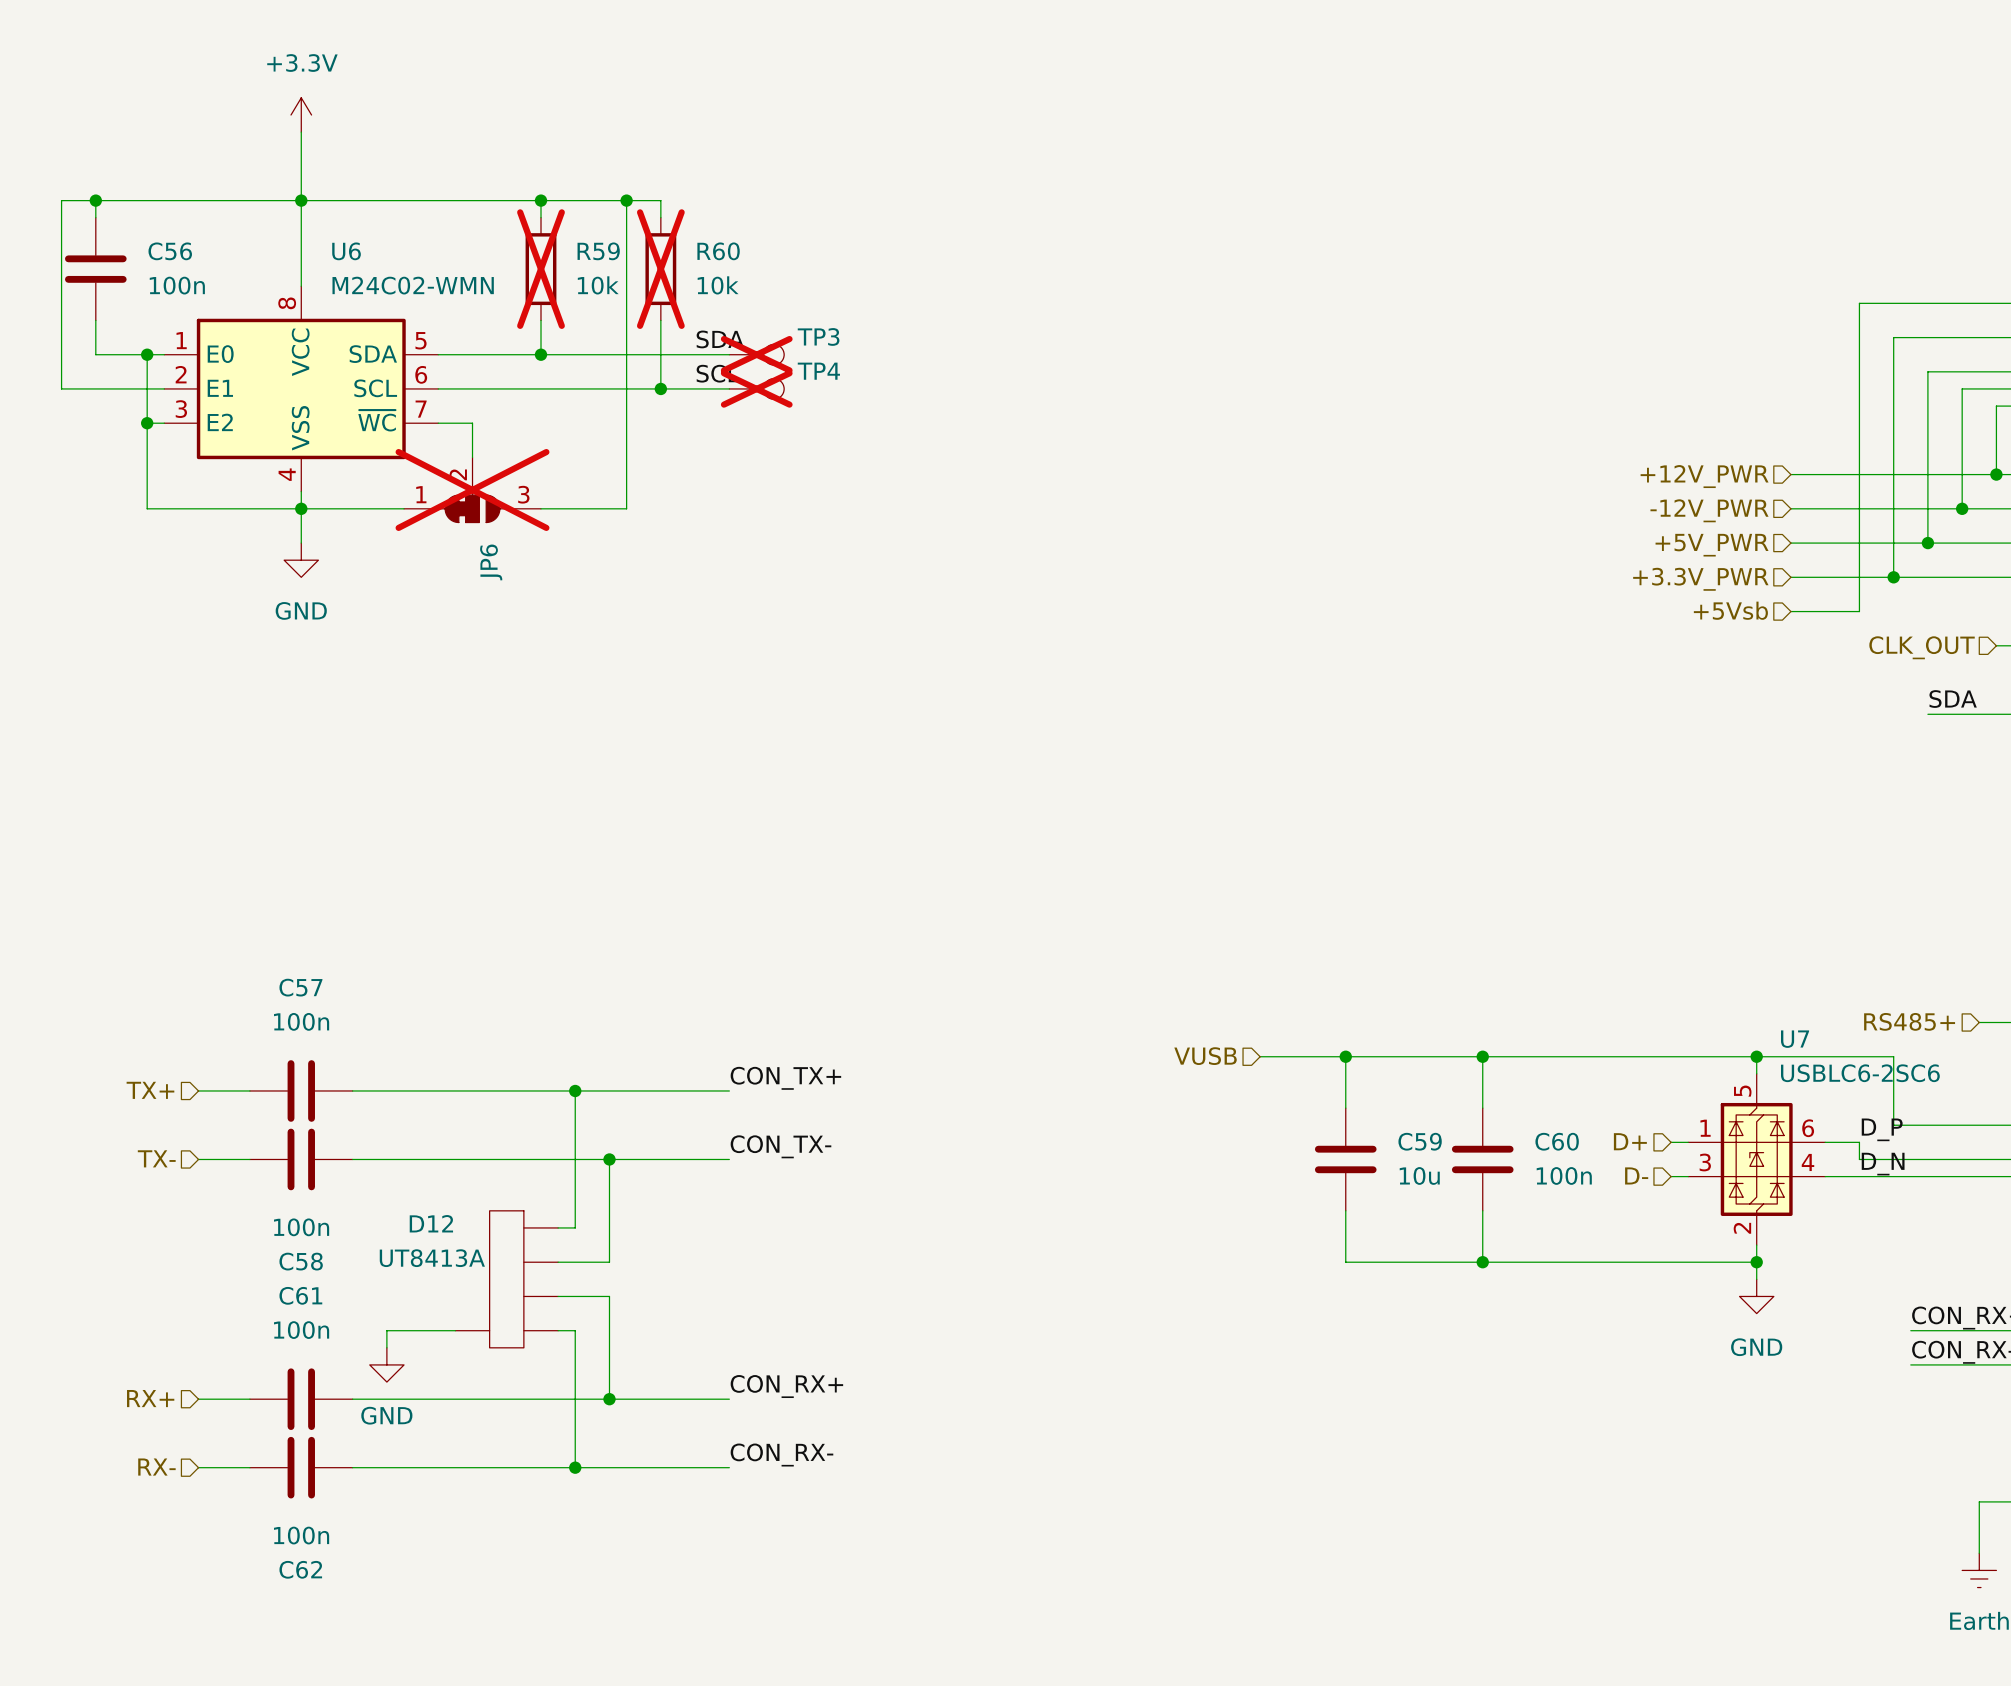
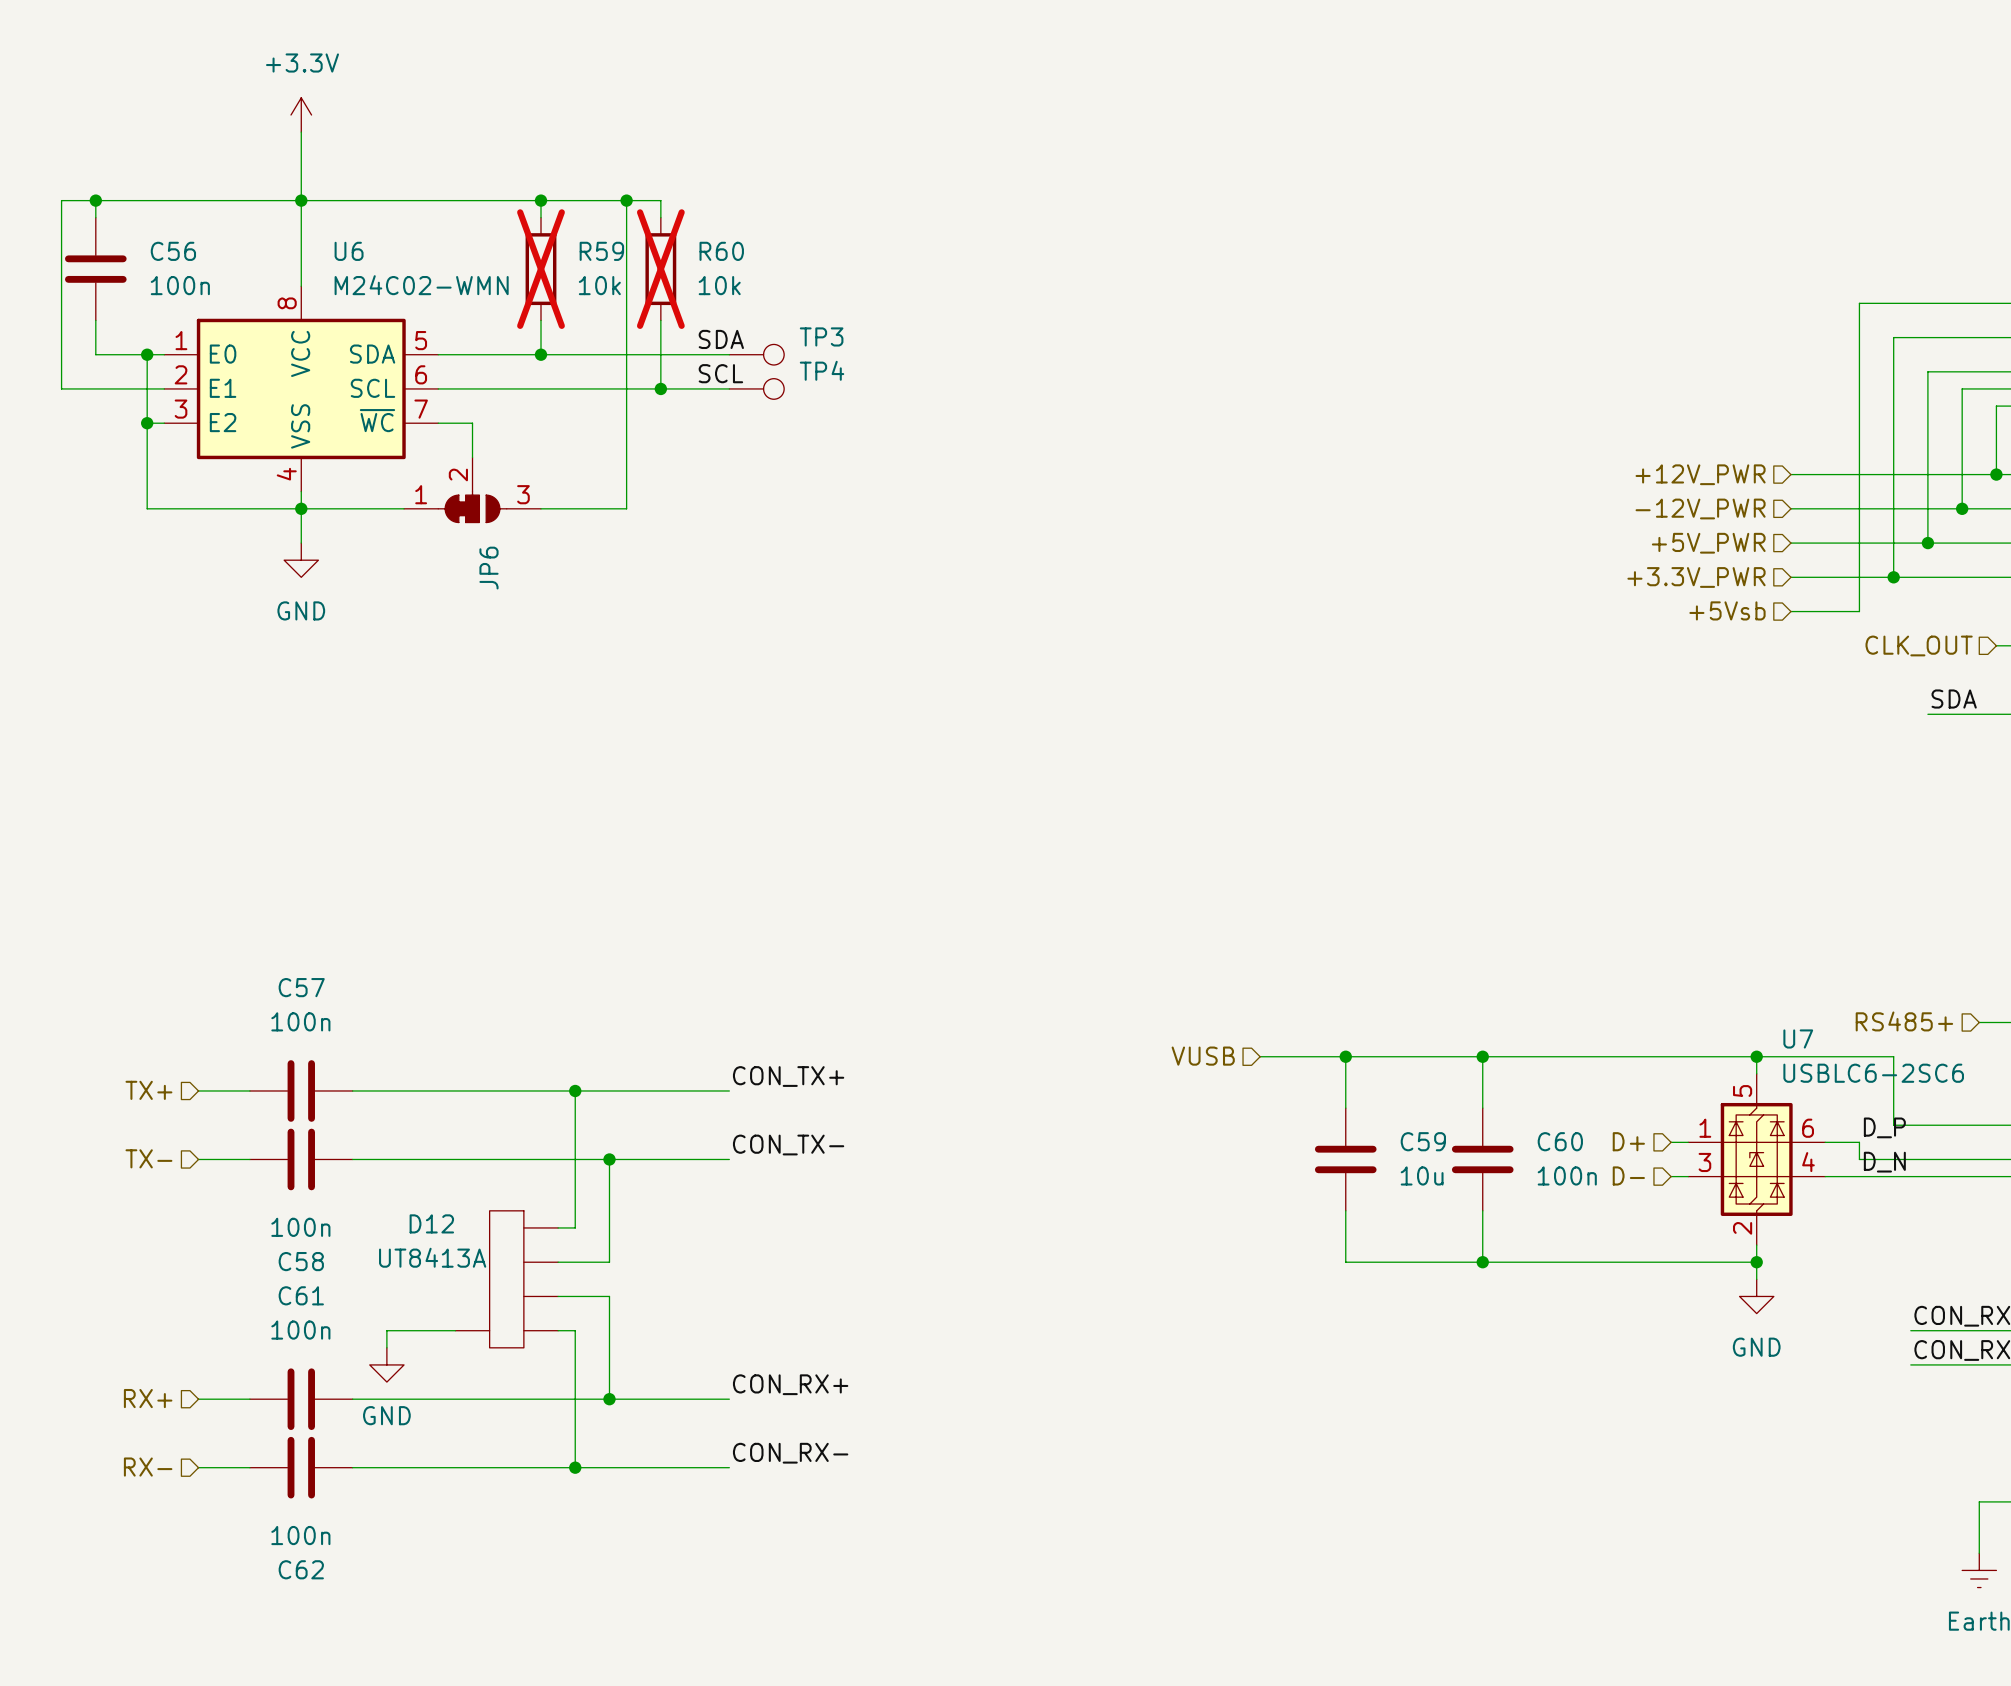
TP3 do-not-place cross: (756, 354) -> none
TP4 do-not-place cross: (756, 388) -> none
JP6 do-not-place cross: (472, 489) -> none

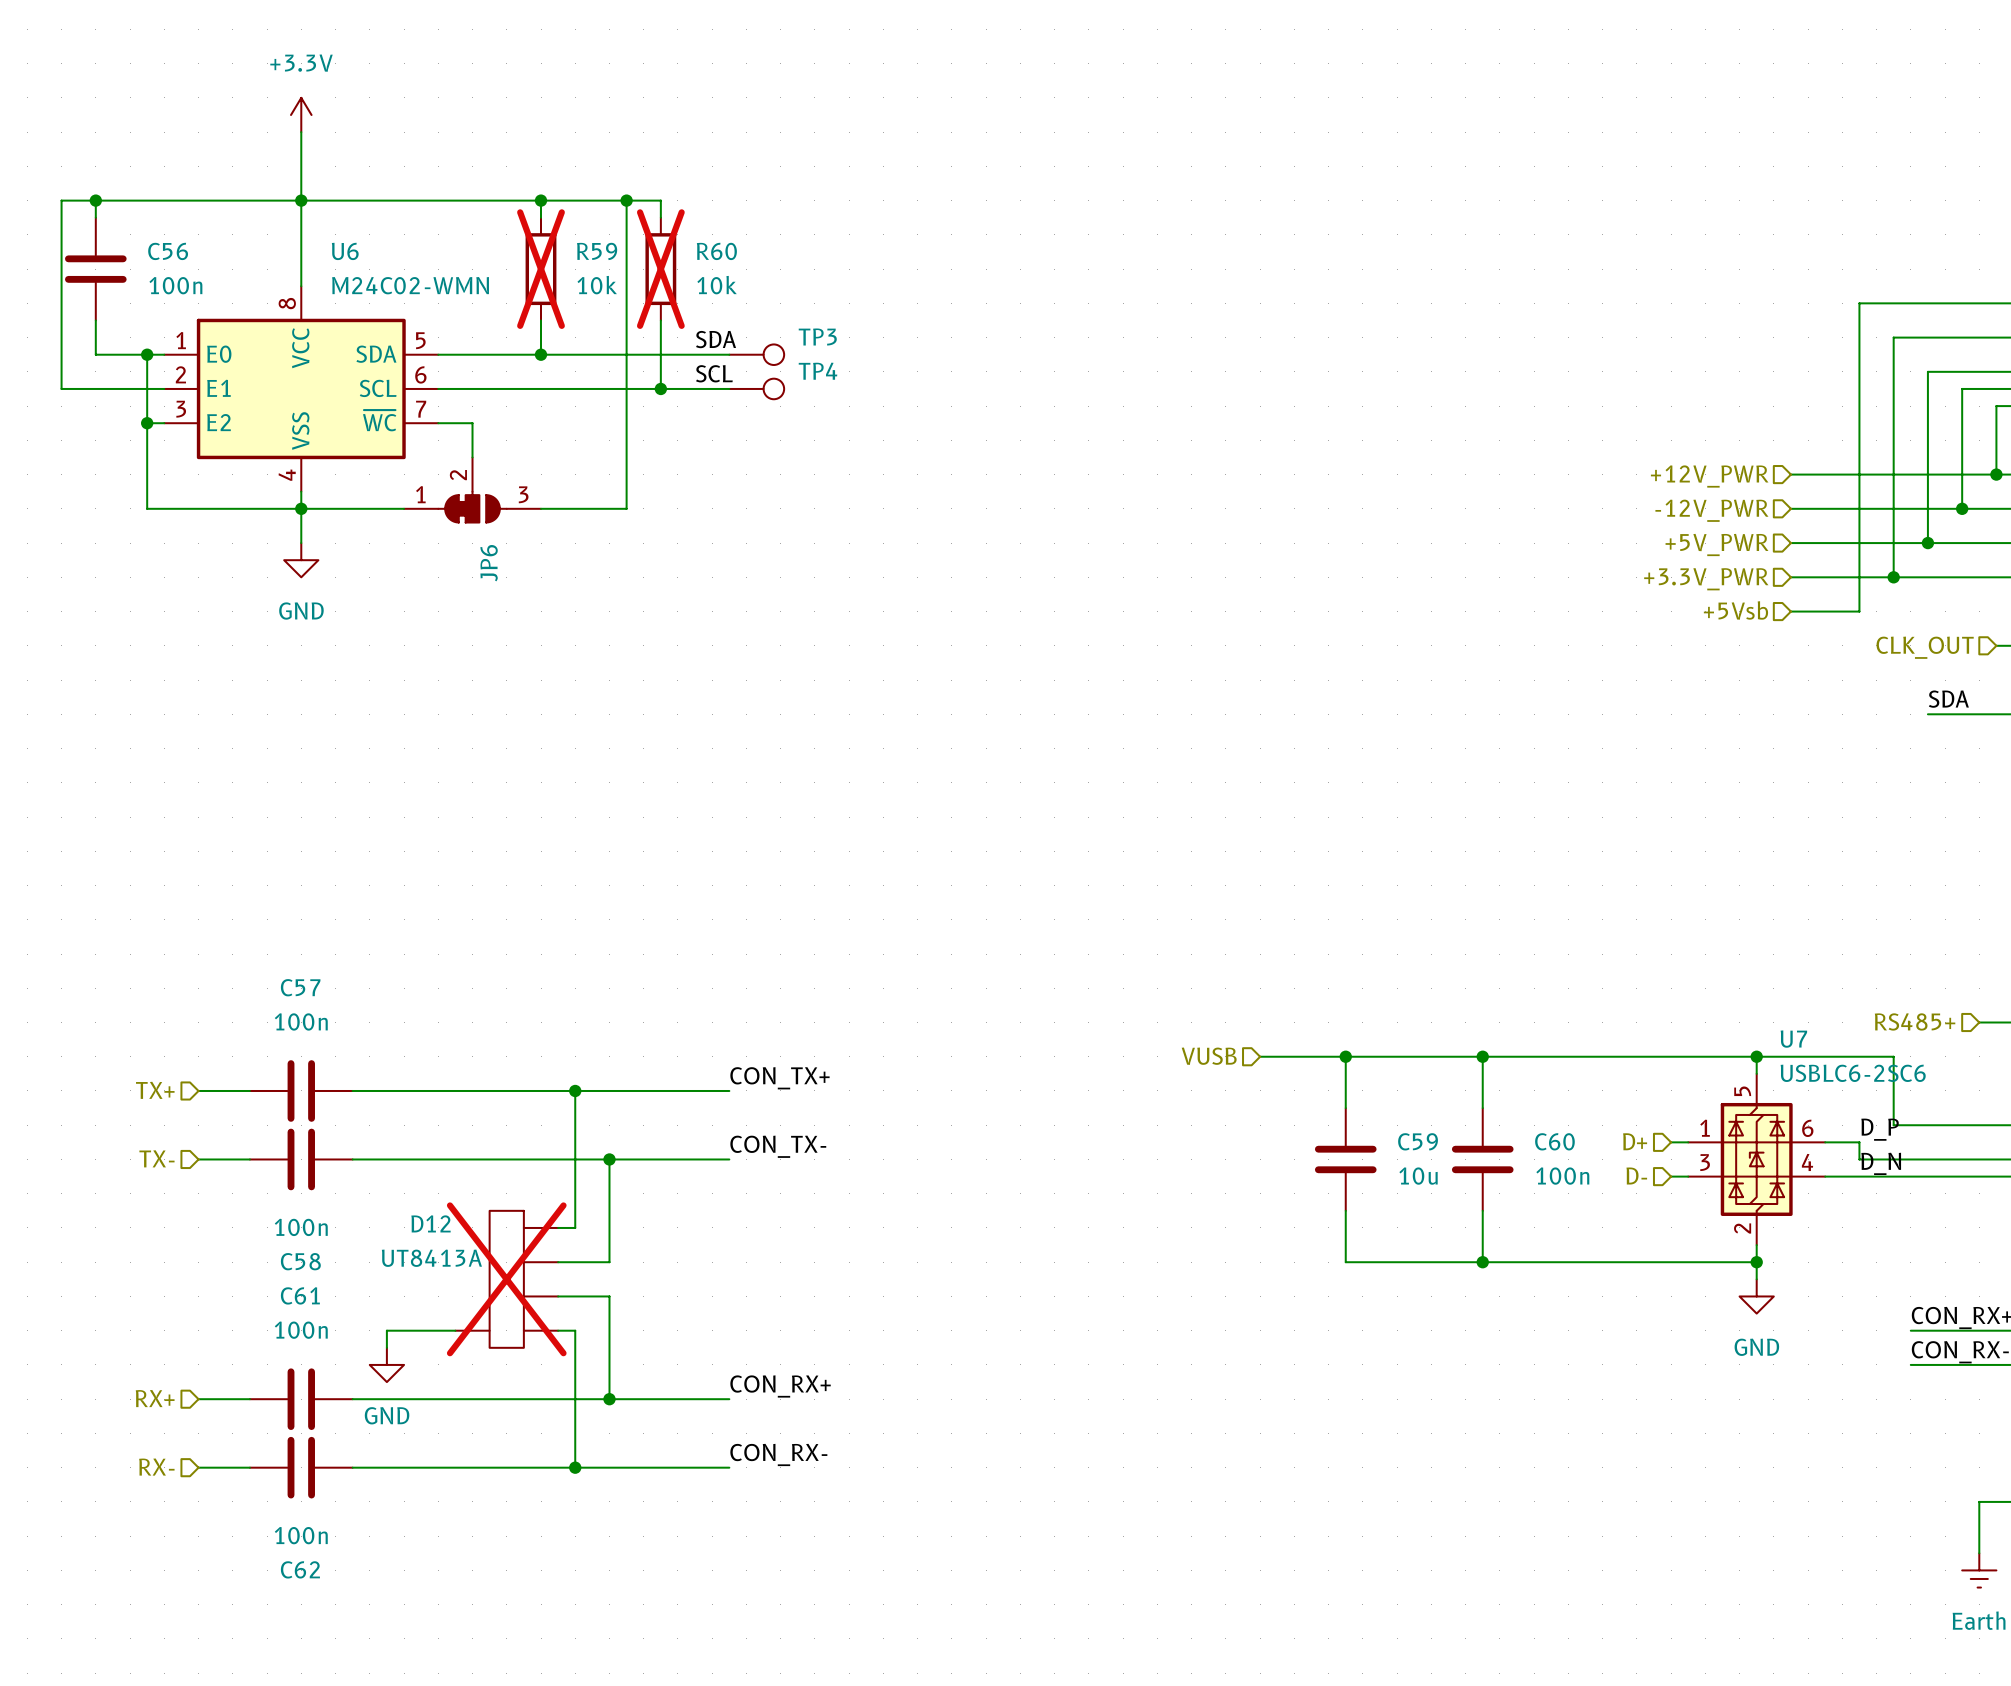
D12 do-not-place cross: none -> (506, 1279)

